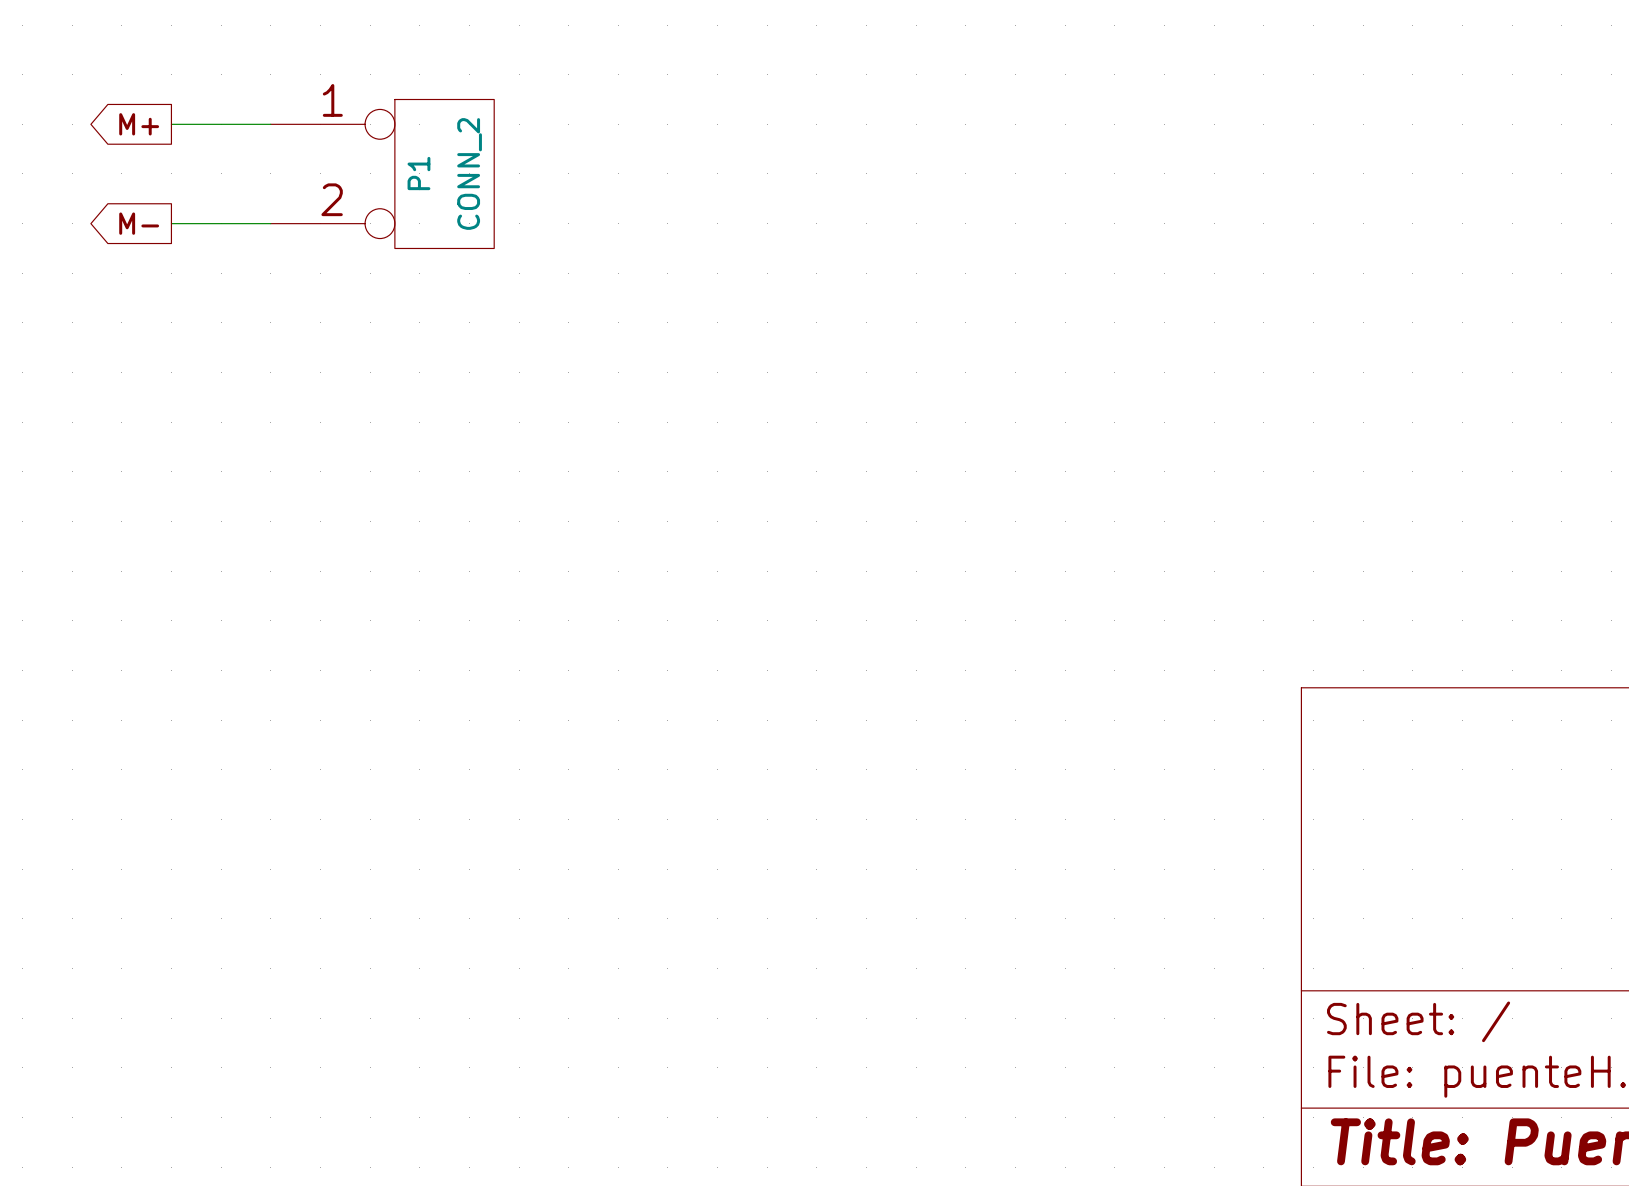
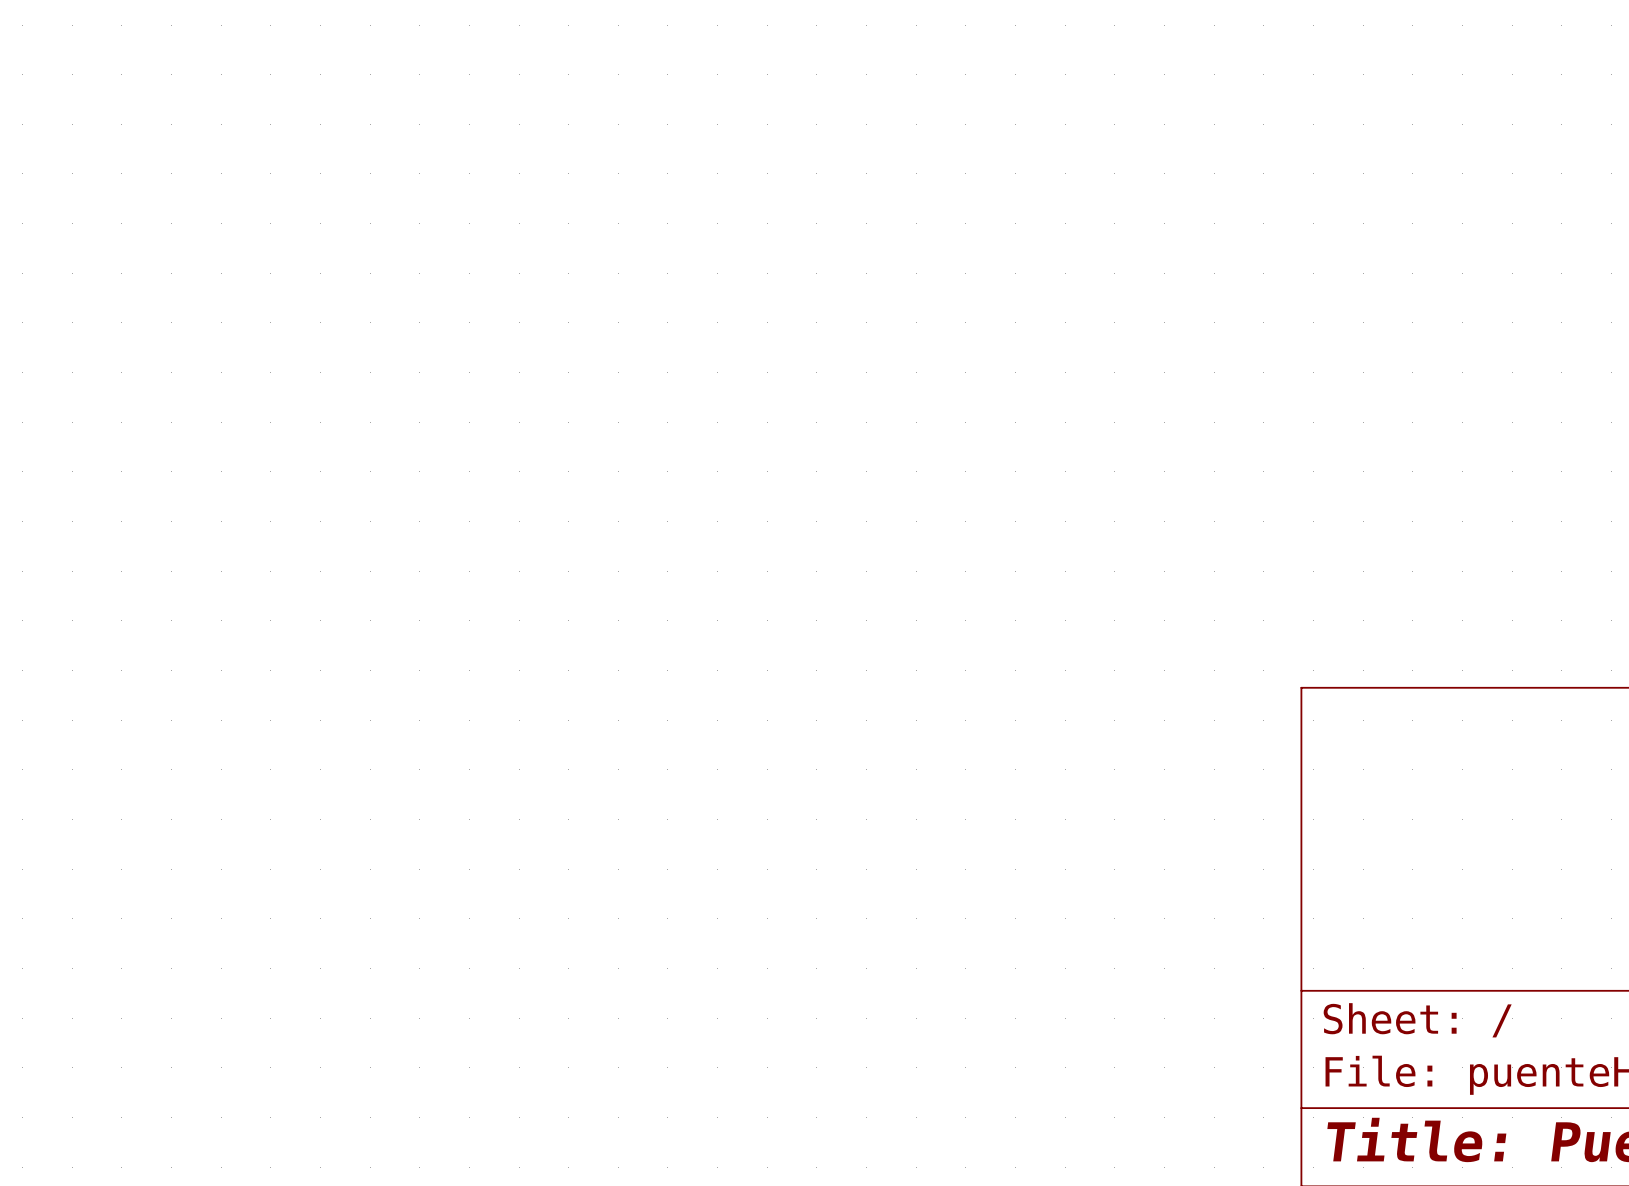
global label: M+ (139, 124) -> none
wire: (171, 124) (270, 124) -> none
P1: CONN_2 (382, 173) -> none
global label: M- (139, 223) -> none
wire: (171, 223) (270, 223) -> none

